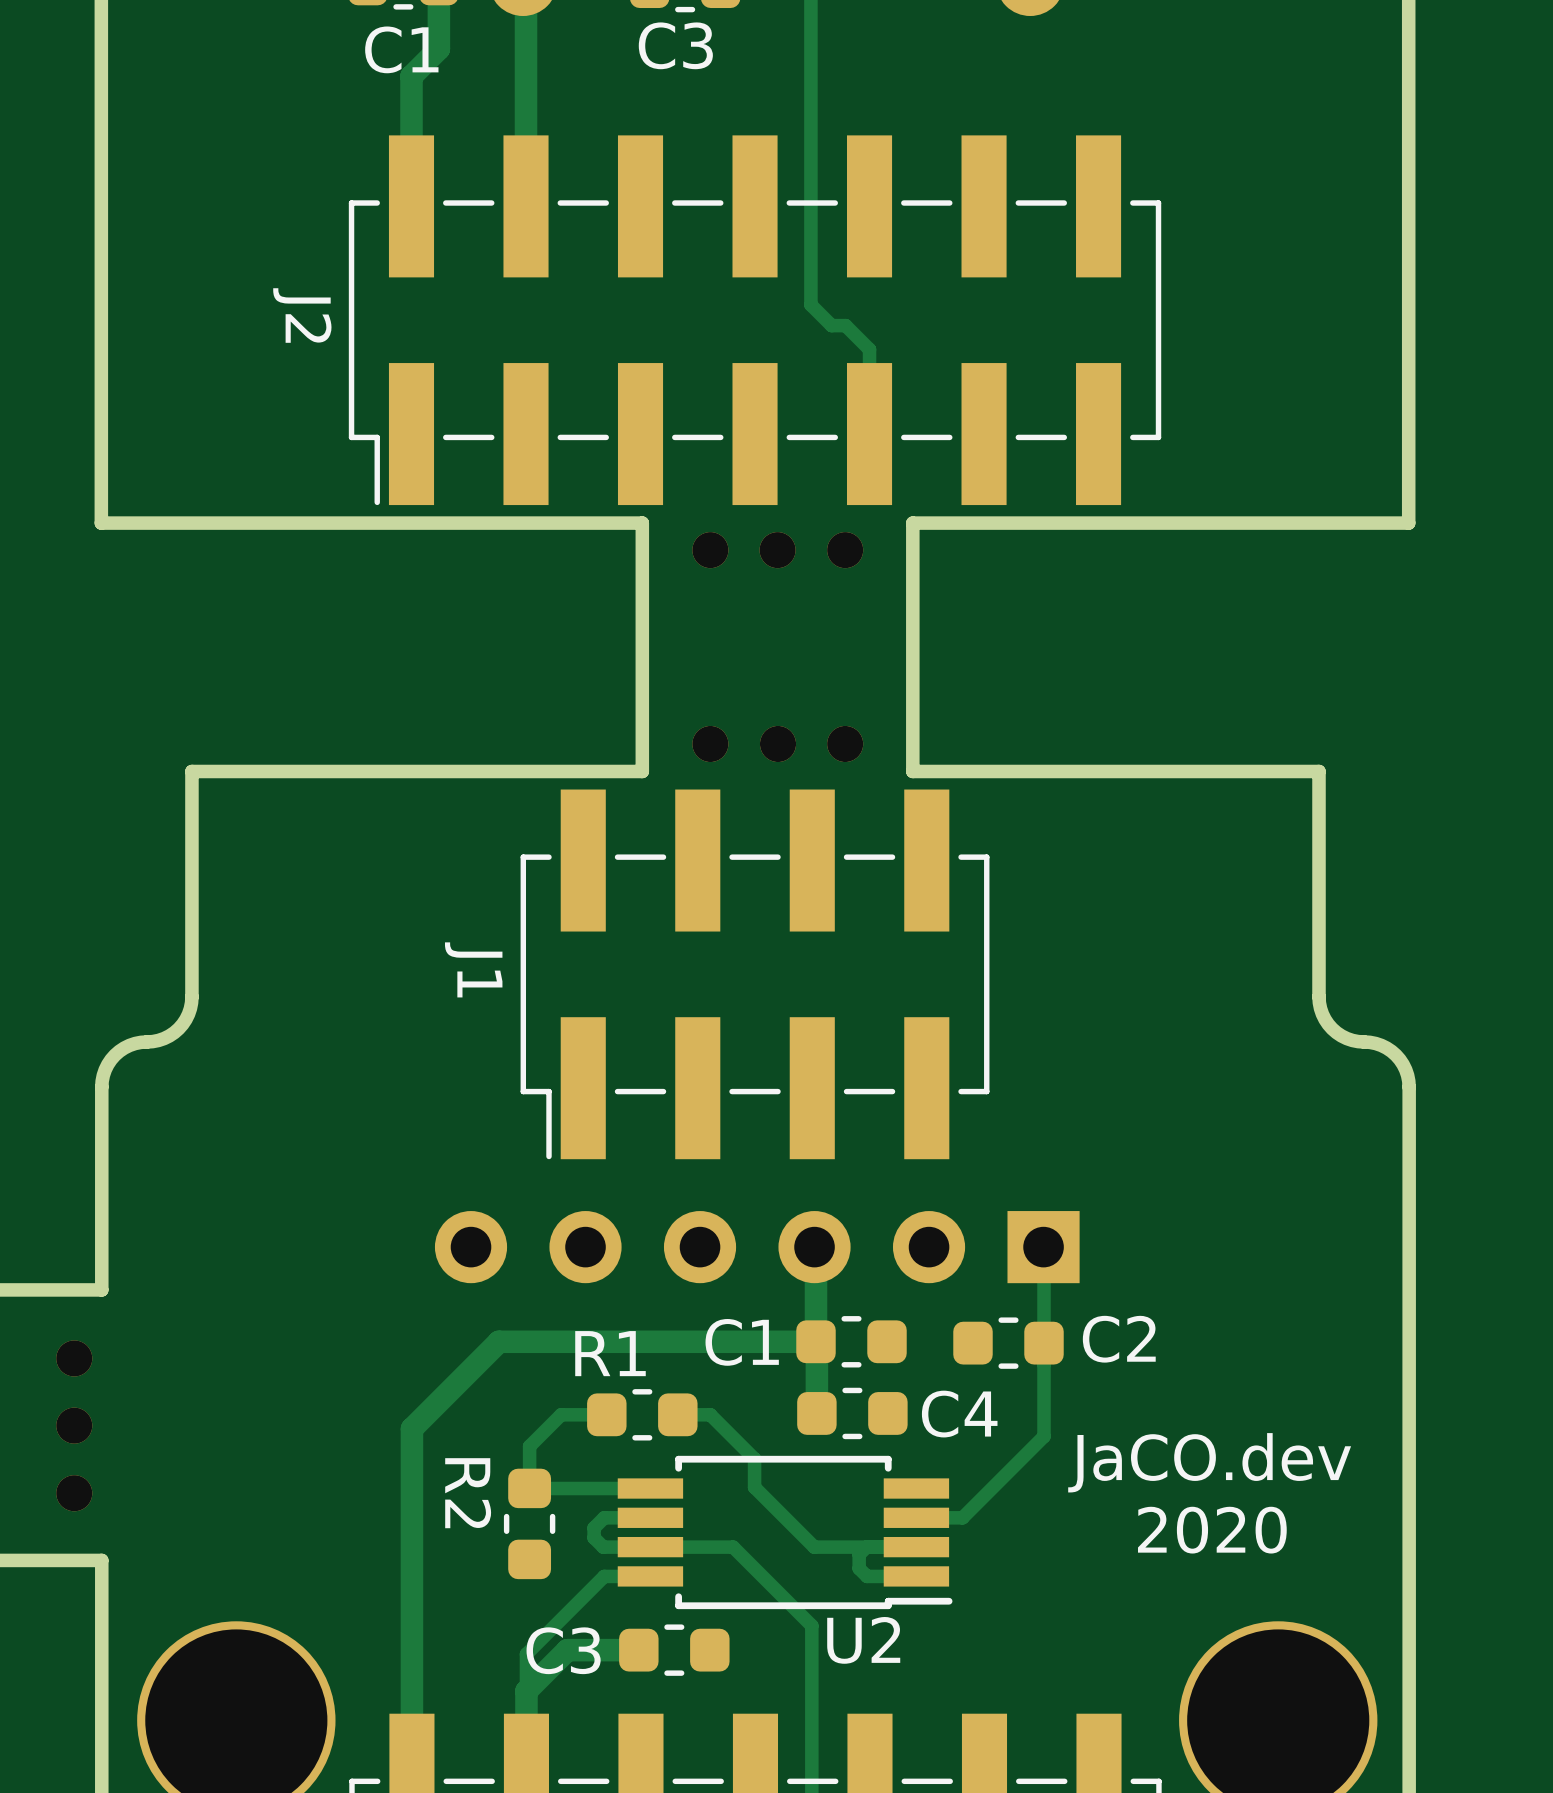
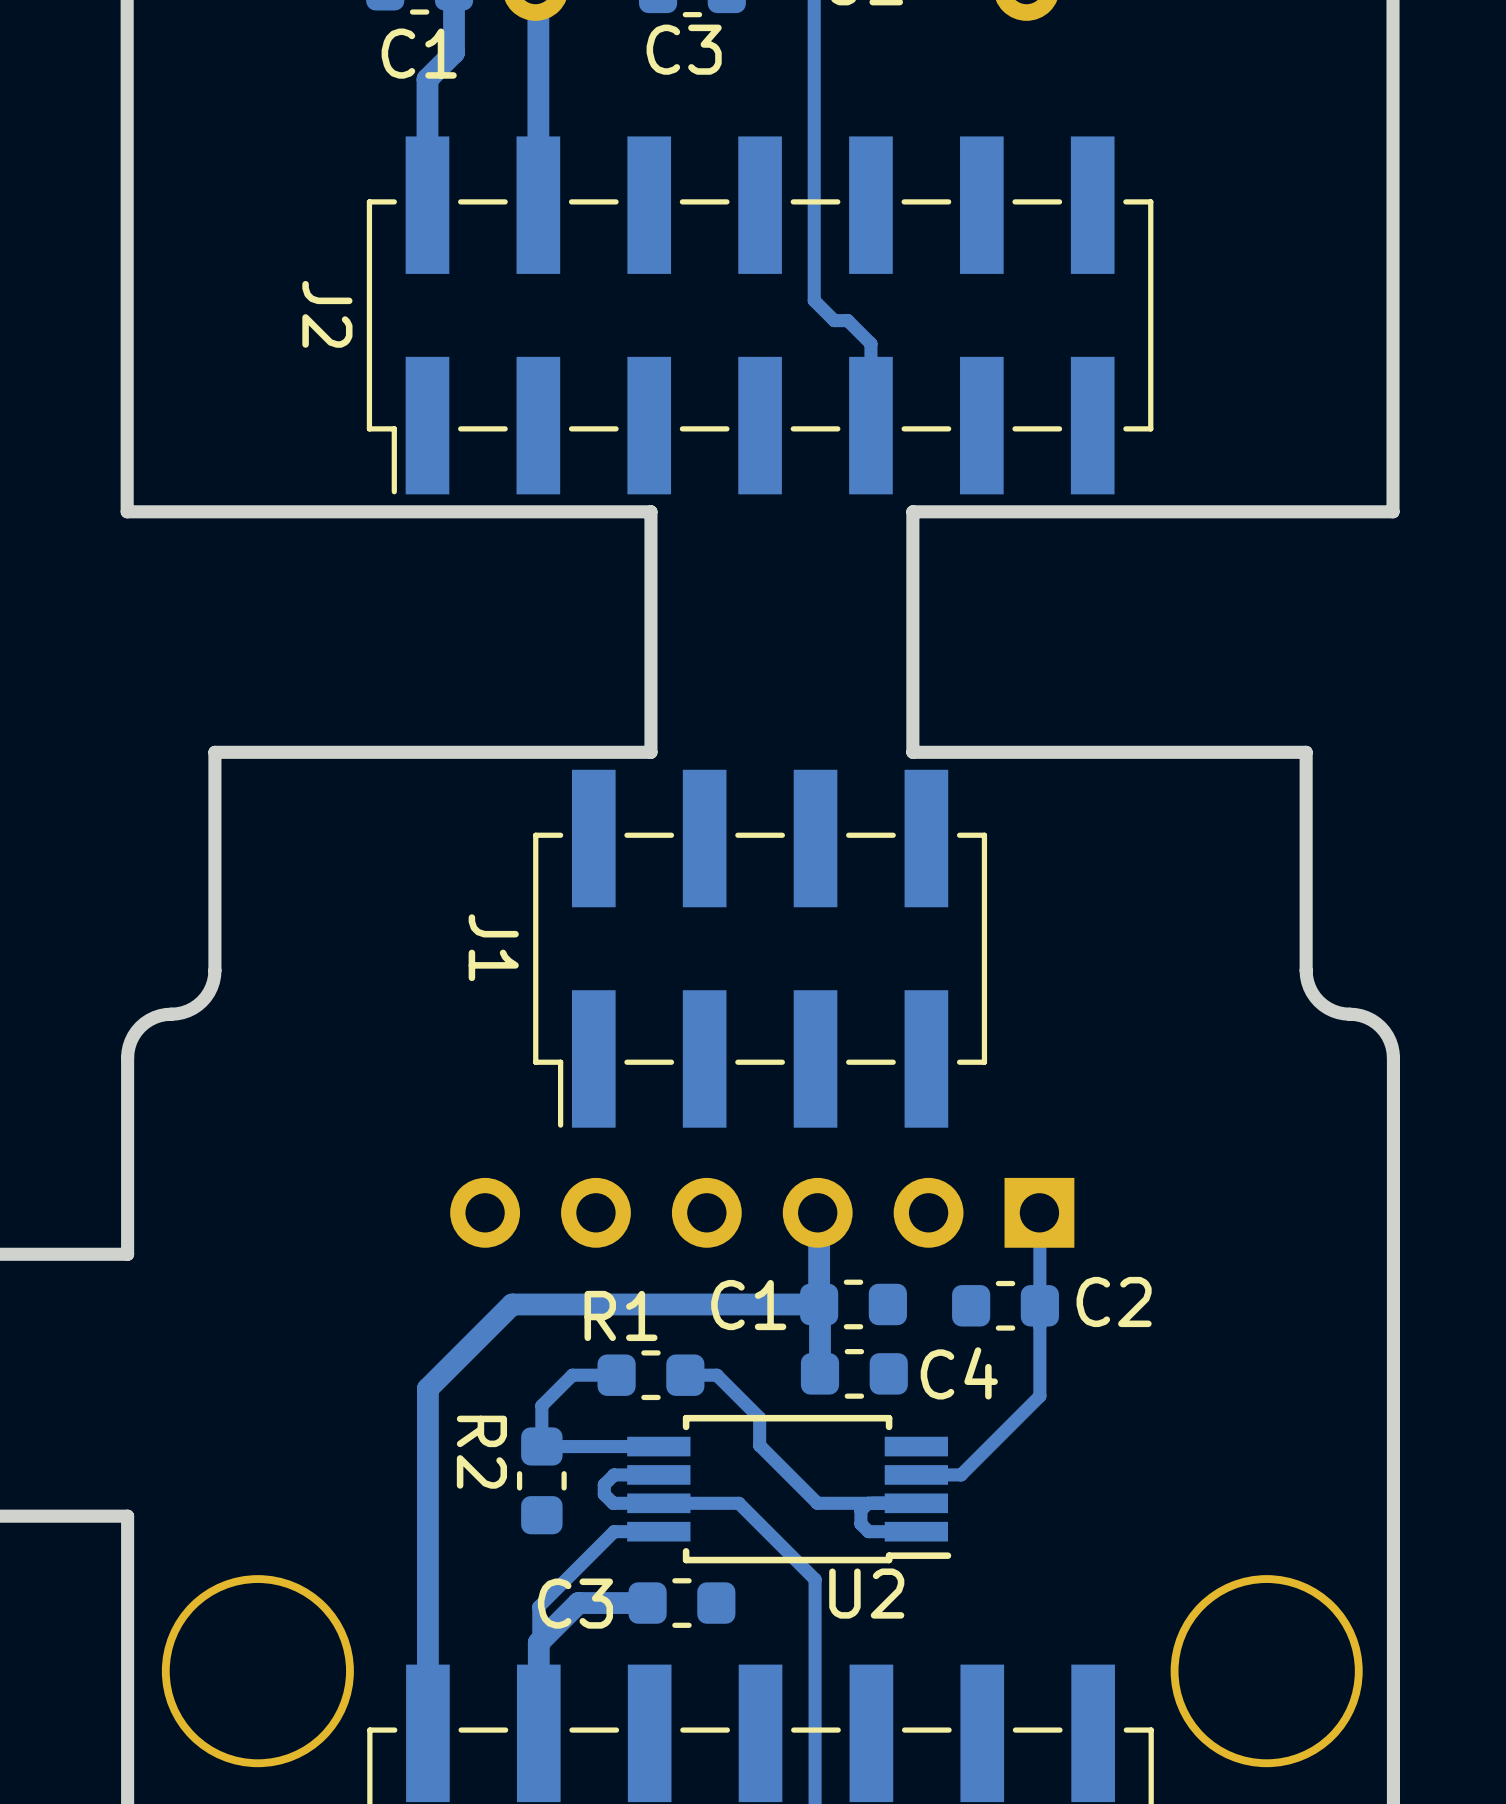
part: (710, 550) -> none
part: (777, 550) -> none
part: (845, 550) -> none
part: (710, 743) -> none
part: (778, 743) -> none
part: (845, 743) -> none
part: (74, 1358) -> none
part: (74, 1425) -> none
text: JaCO.dev (1209, 1462) -> none
part: (74, 1493) -> none
text: 2020 (1212, 1530) -> none

